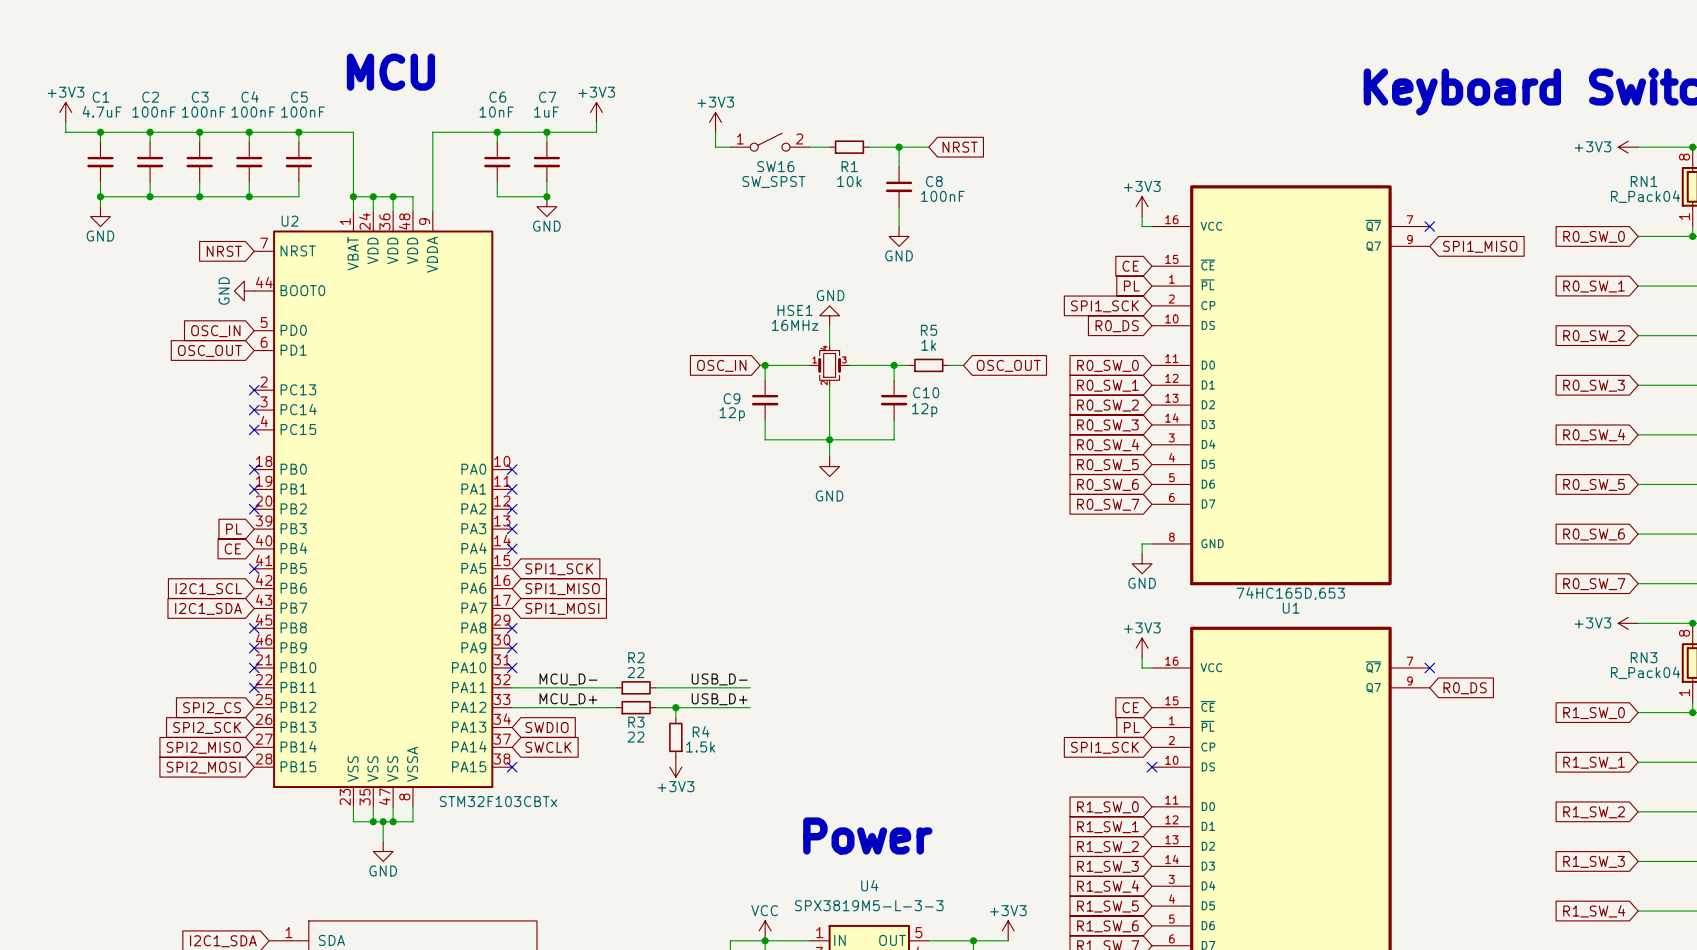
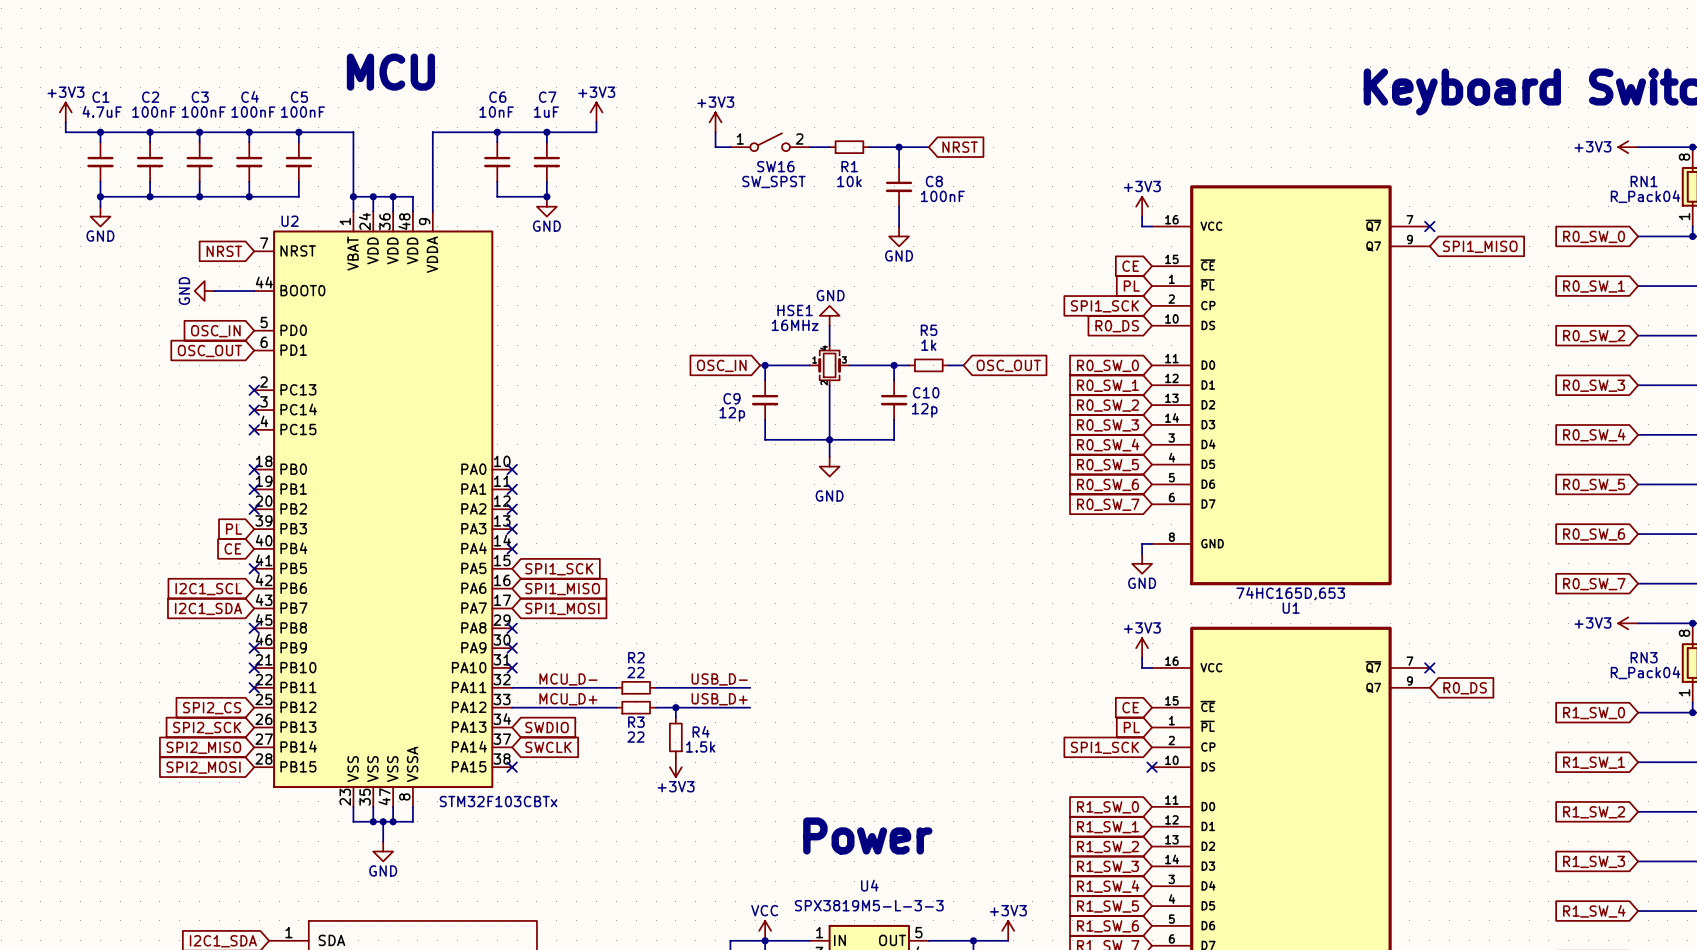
wire: none -> (214, 291) (254, 291)
power symbol position: GND (244, 291) -> GND (204, 291)

